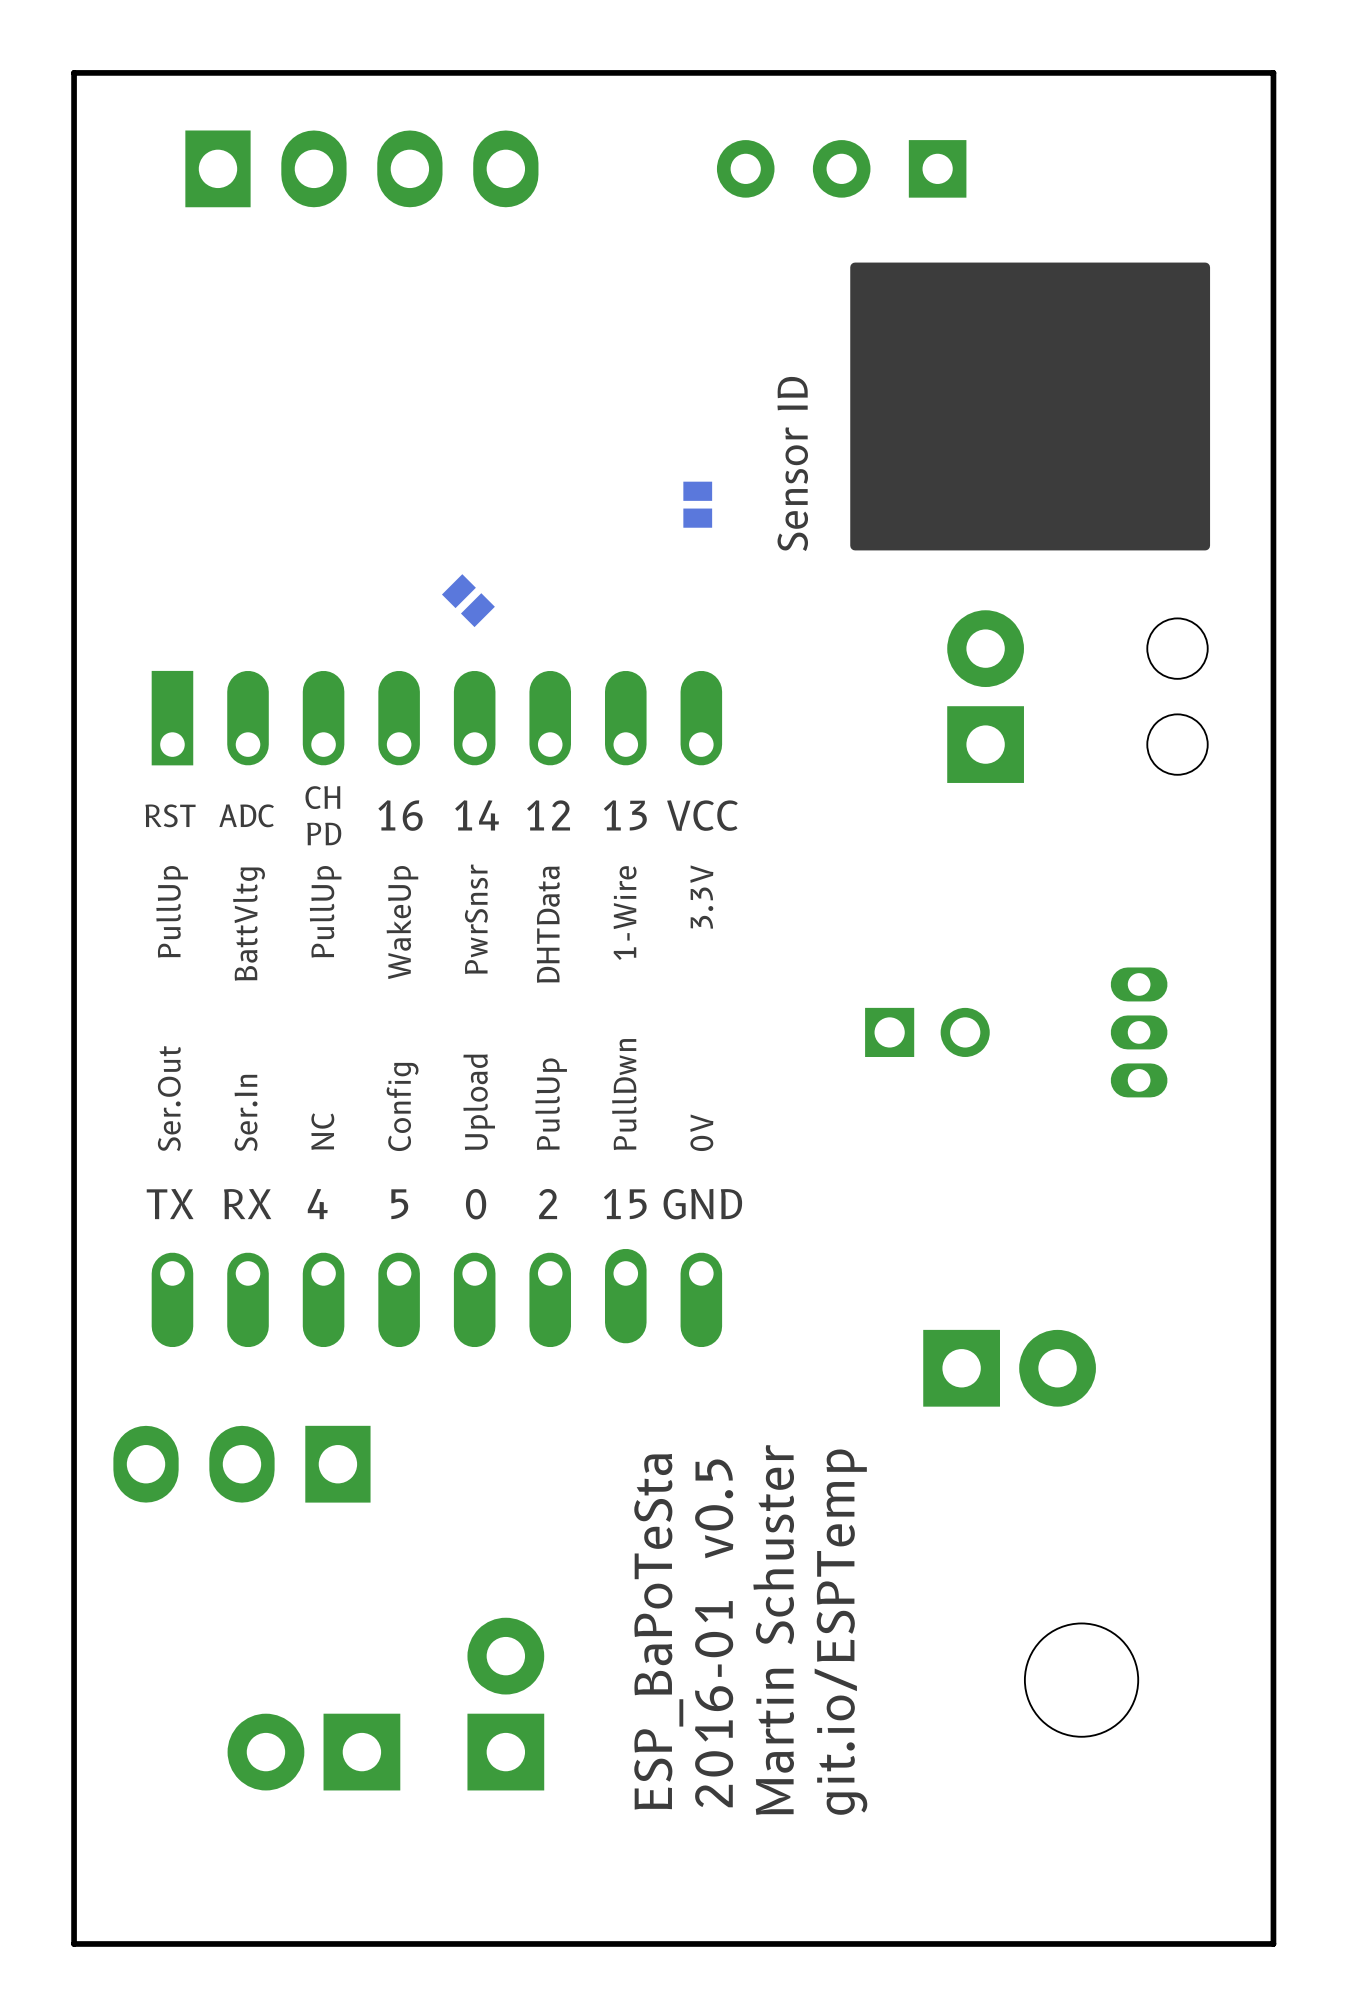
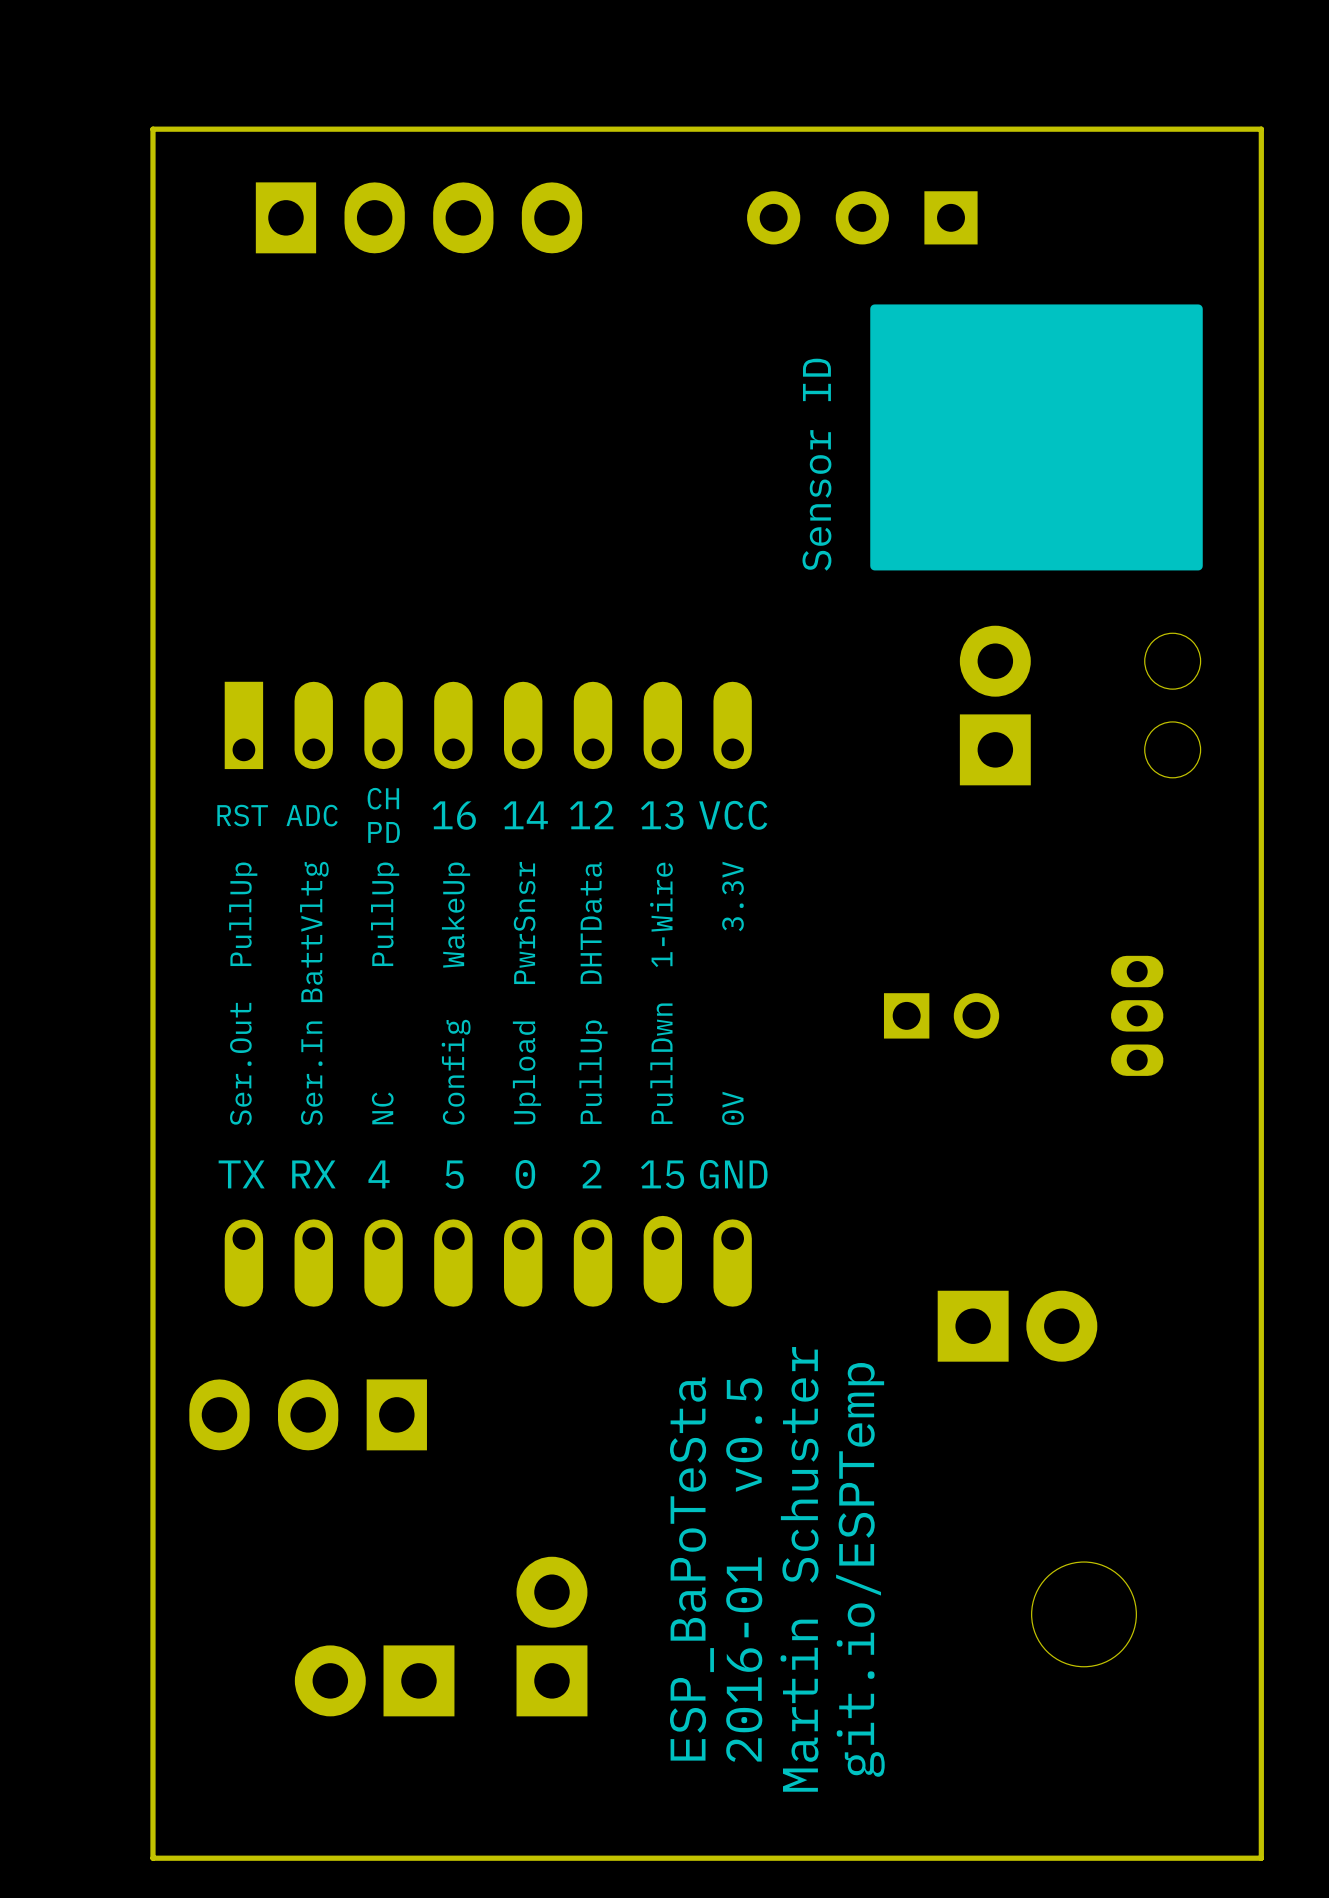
part: (697, 504) -> none
part: (468, 600) -> none

